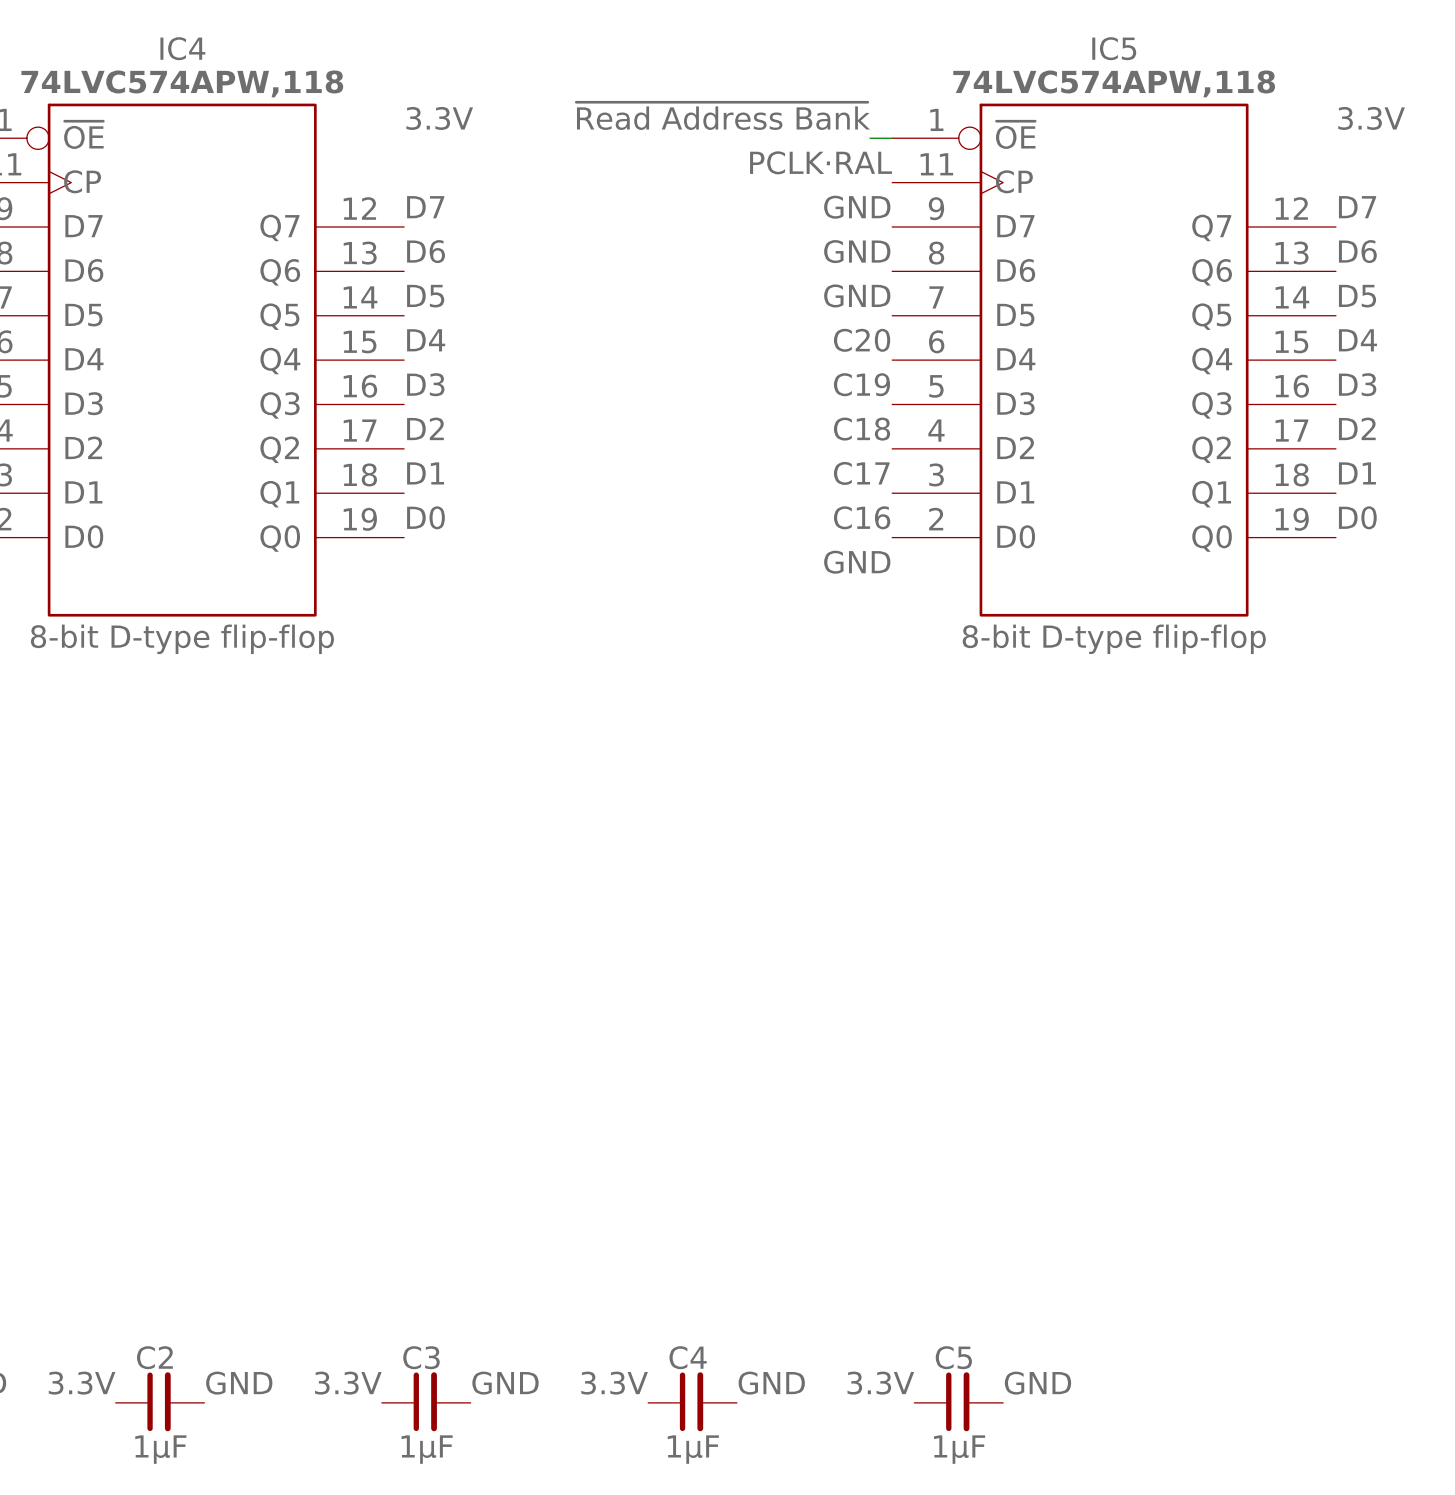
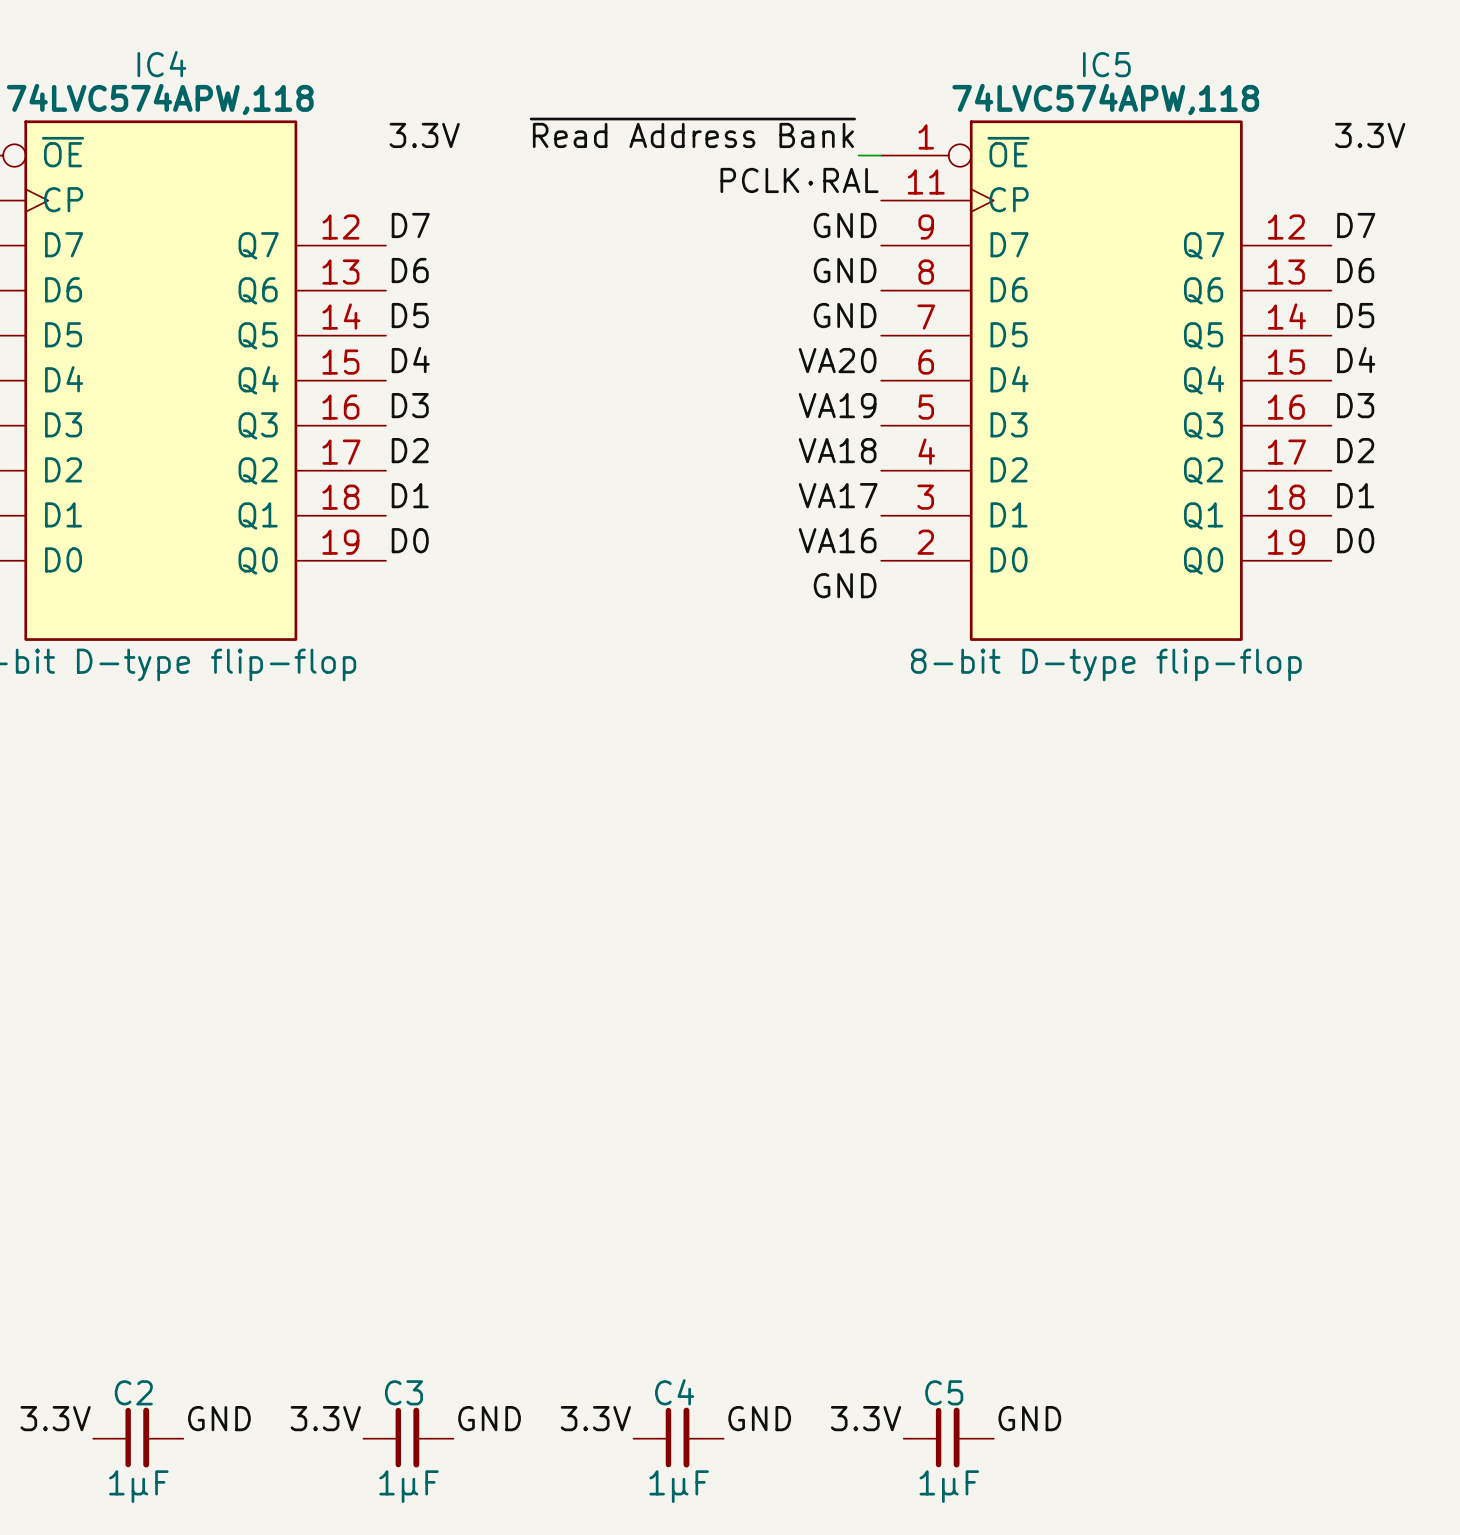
label: C20 (862, 340) -> VA20 (837, 360)
label: C19 (862, 384) -> VA19 (837, 405)
label: C18 (862, 429) -> VA18 (837, 450)
label: C17 (861, 473) -> VA17 (838, 495)
label: C16 (862, 517) -> VA16 (837, 540)

